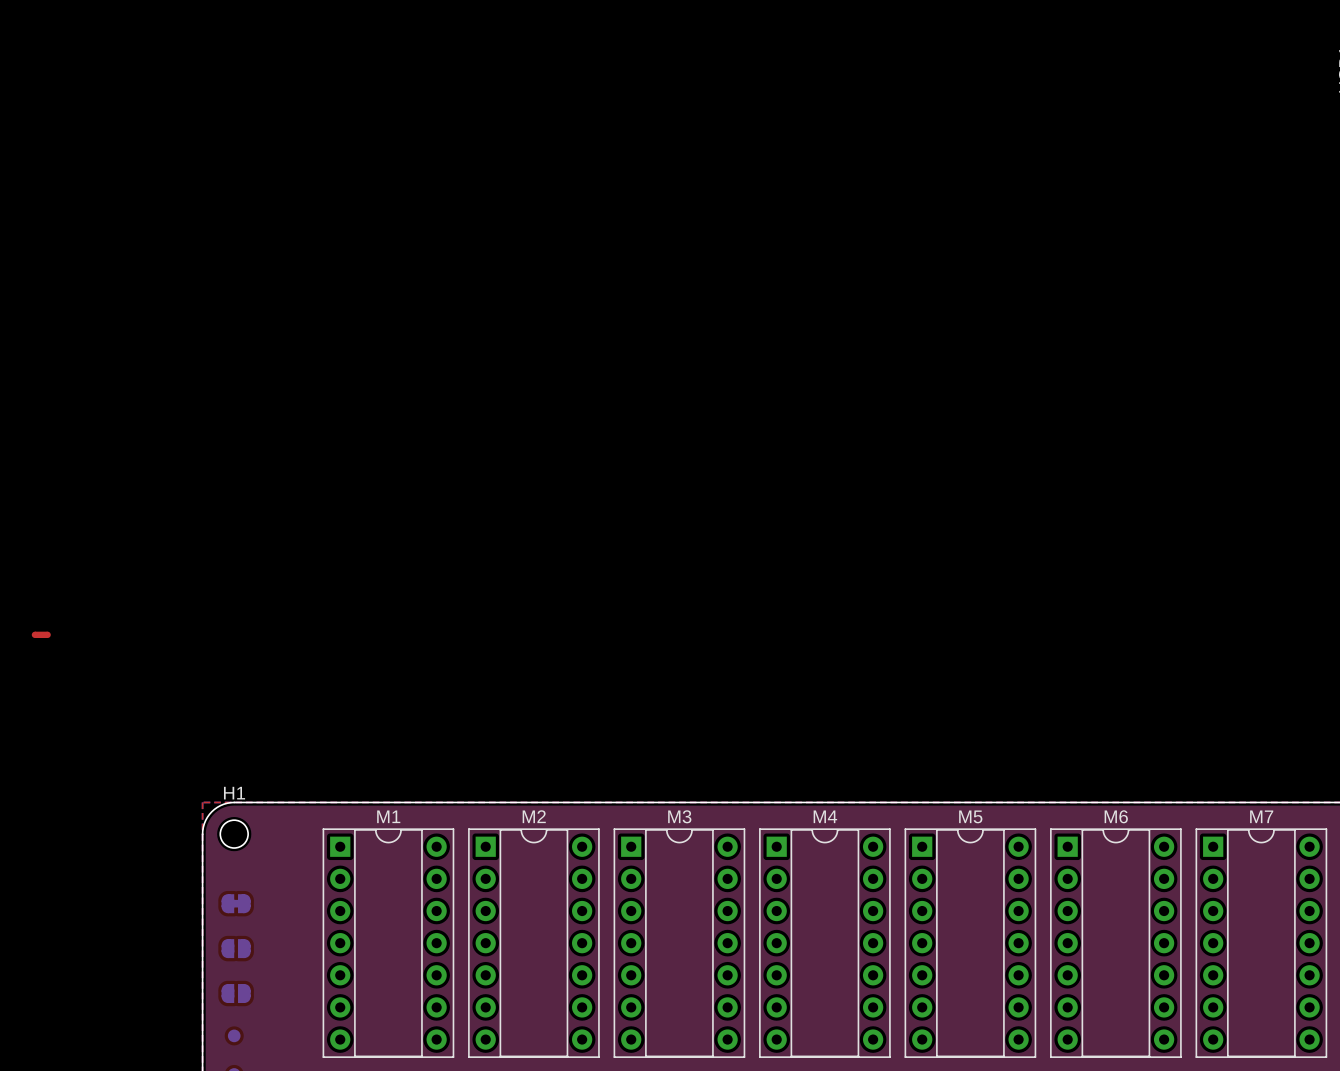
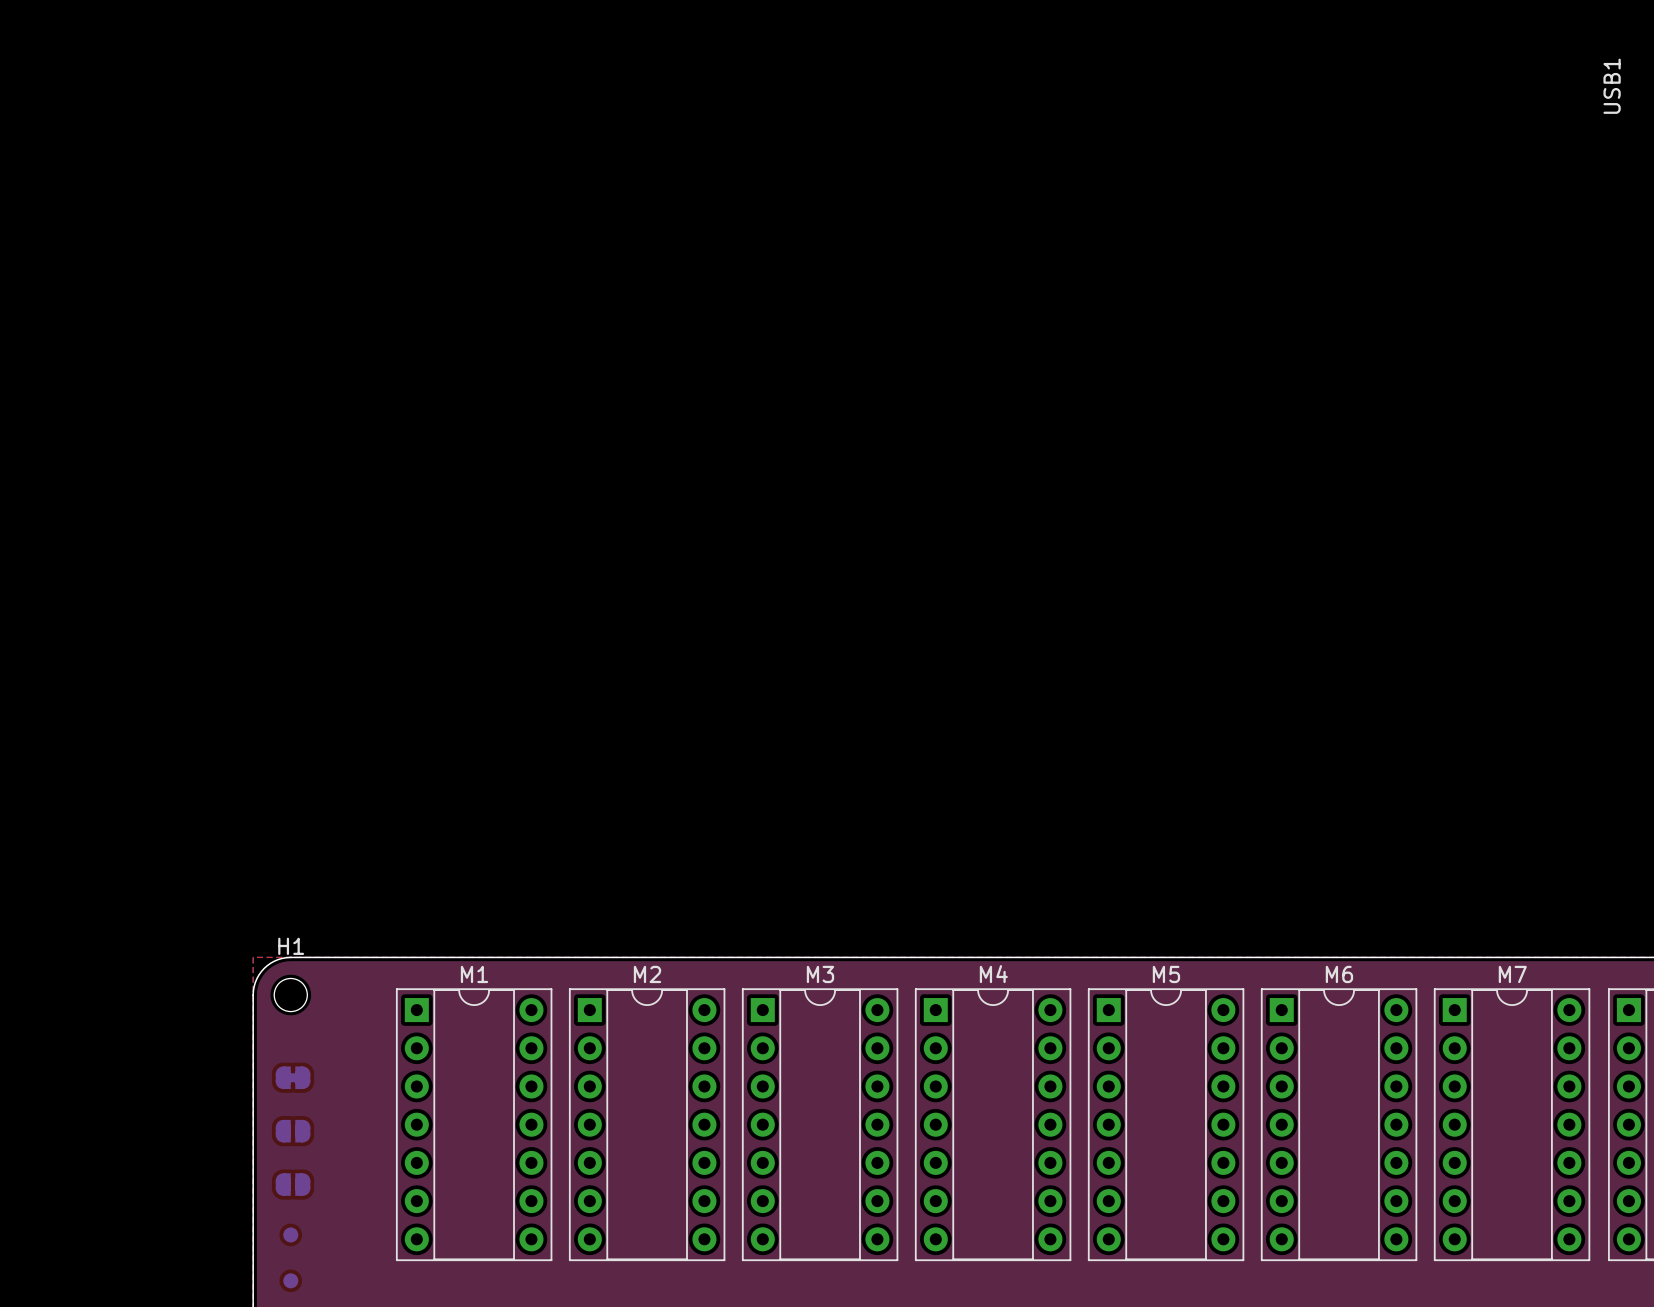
part: (41, 634) -> none

